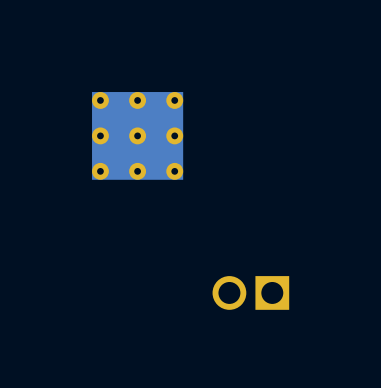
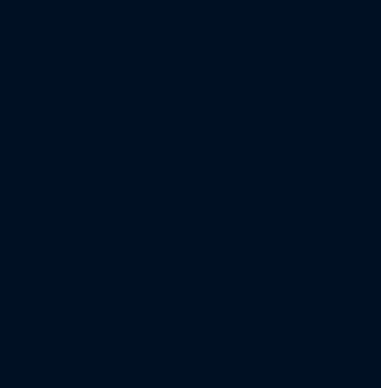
part: (137, 135) -> none
part: (250, 292) -> none

